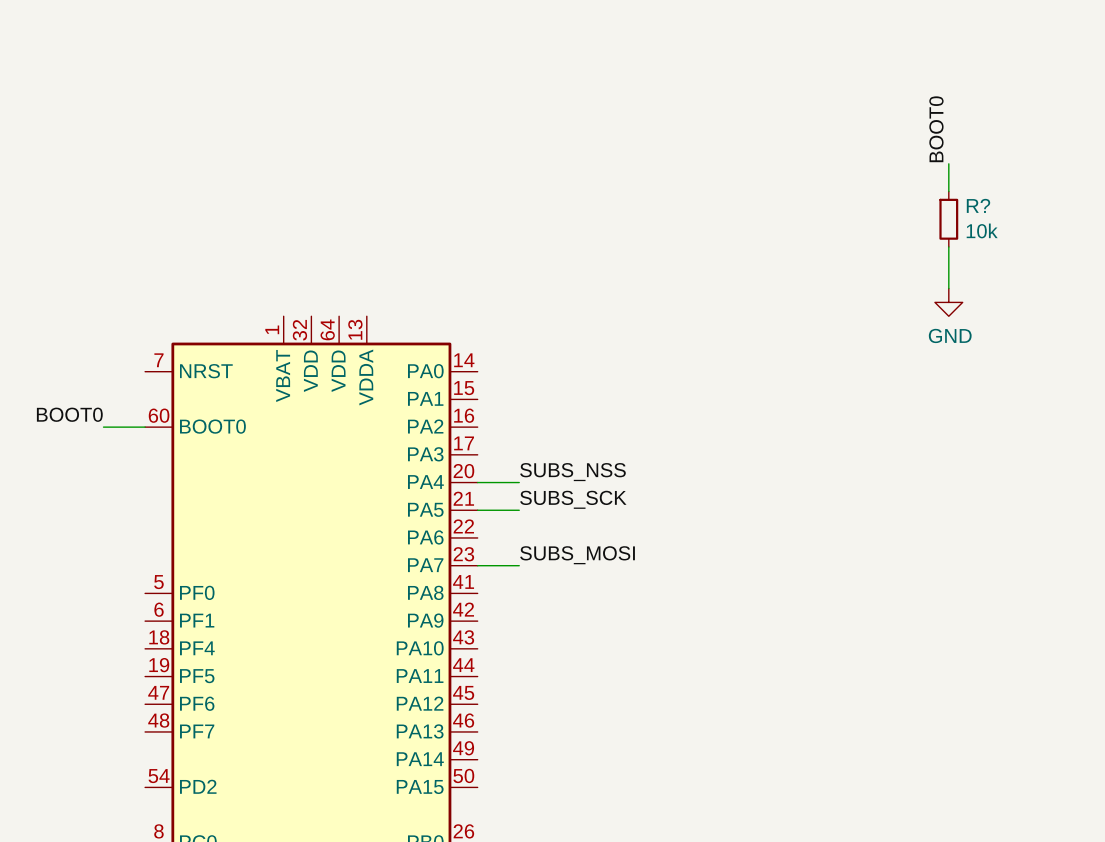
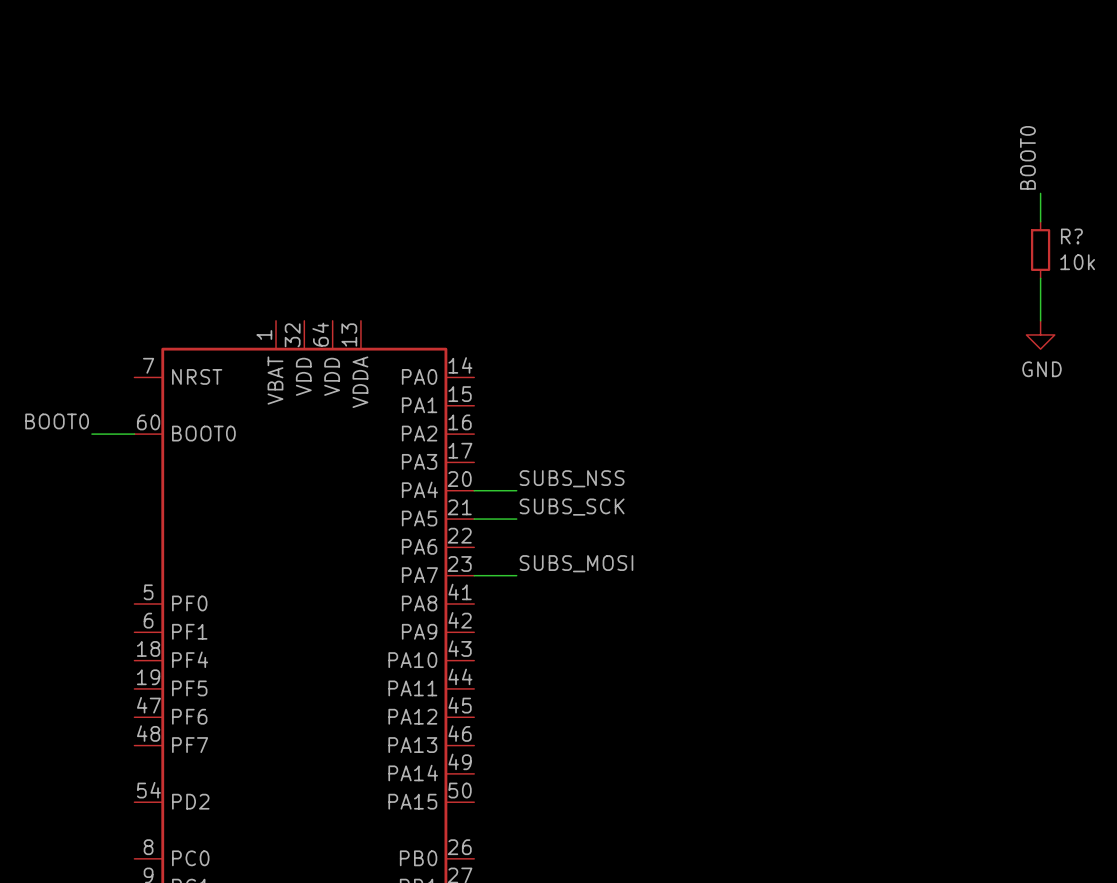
label position: BOOT0 (936, 129) -> BOOT0 (1027, 157)
wire: (948, 163) (948, 191) -> (1040, 193) (1040, 221)
R? position: (948, 219) -> (1040, 250)
wire: (948, 246) (948, 288) -> (1040, 278) (1040, 320)
power symbol position: GND (948, 302) -> GND (1040, 334)

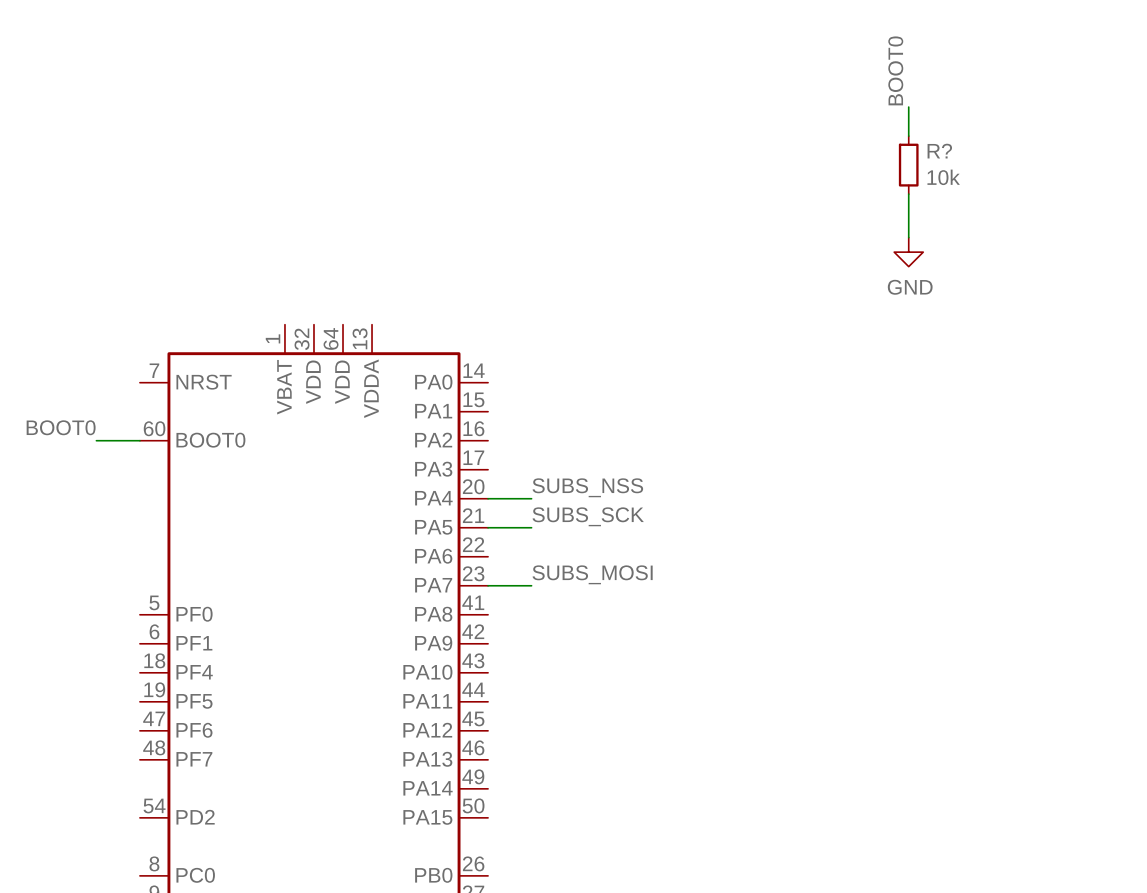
label position: BOOT0 (1027, 157) -> BOOT0 (895, 70)
wire: (1040, 193) (1040, 221) -> (908, 107) (908, 136)
R? position: (1040, 250) -> (908, 165)
wire: (1040, 278) (1040, 320) -> (908, 194) (908, 237)
power symbol position: GND (1040, 334) -> GND (908, 252)

